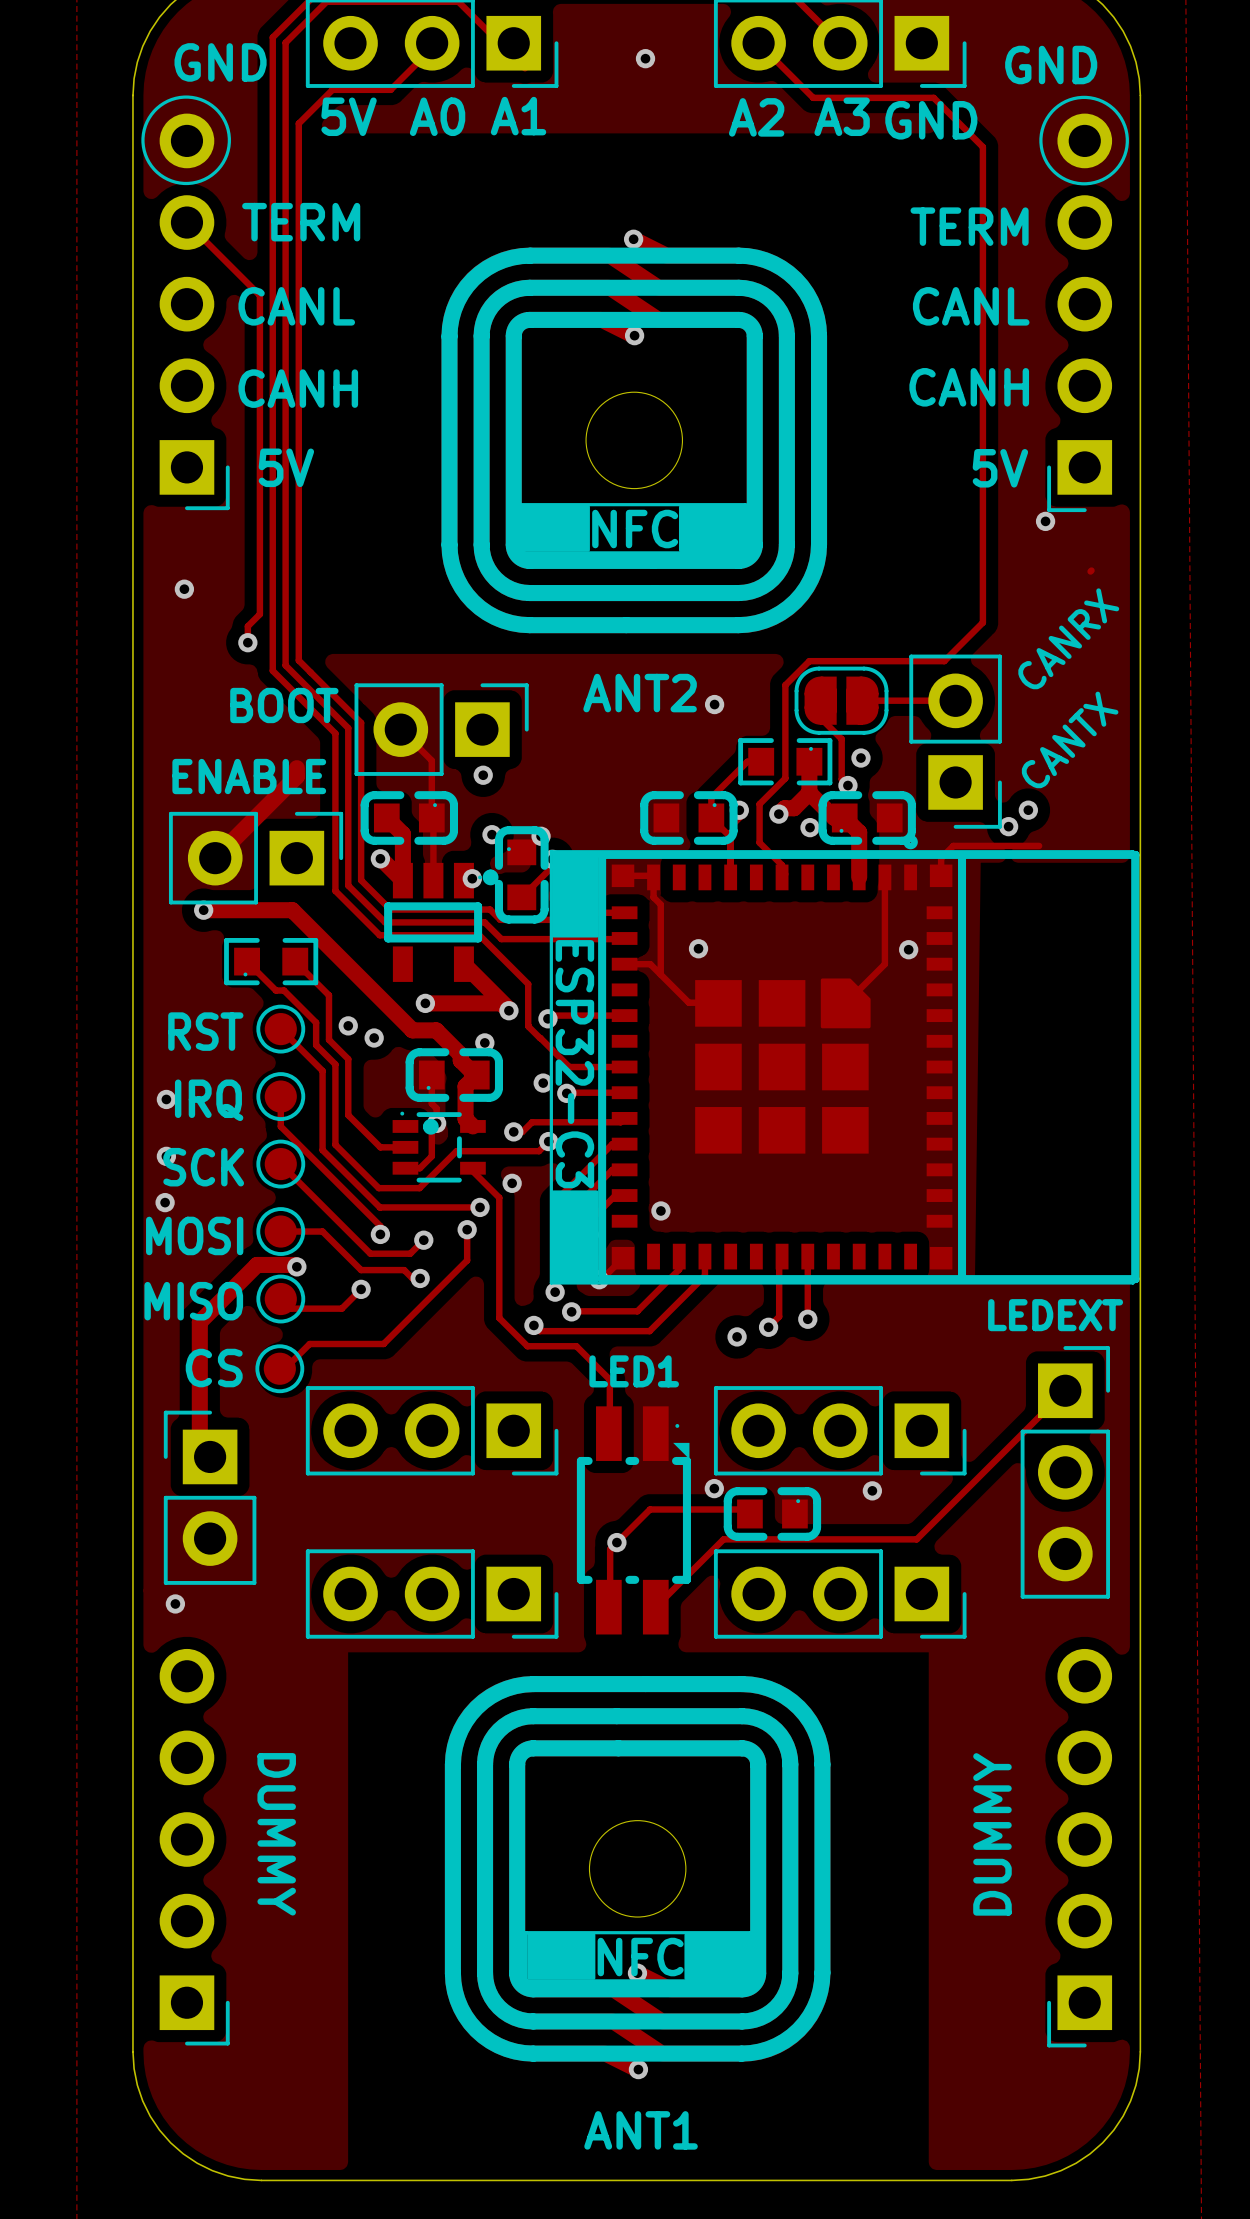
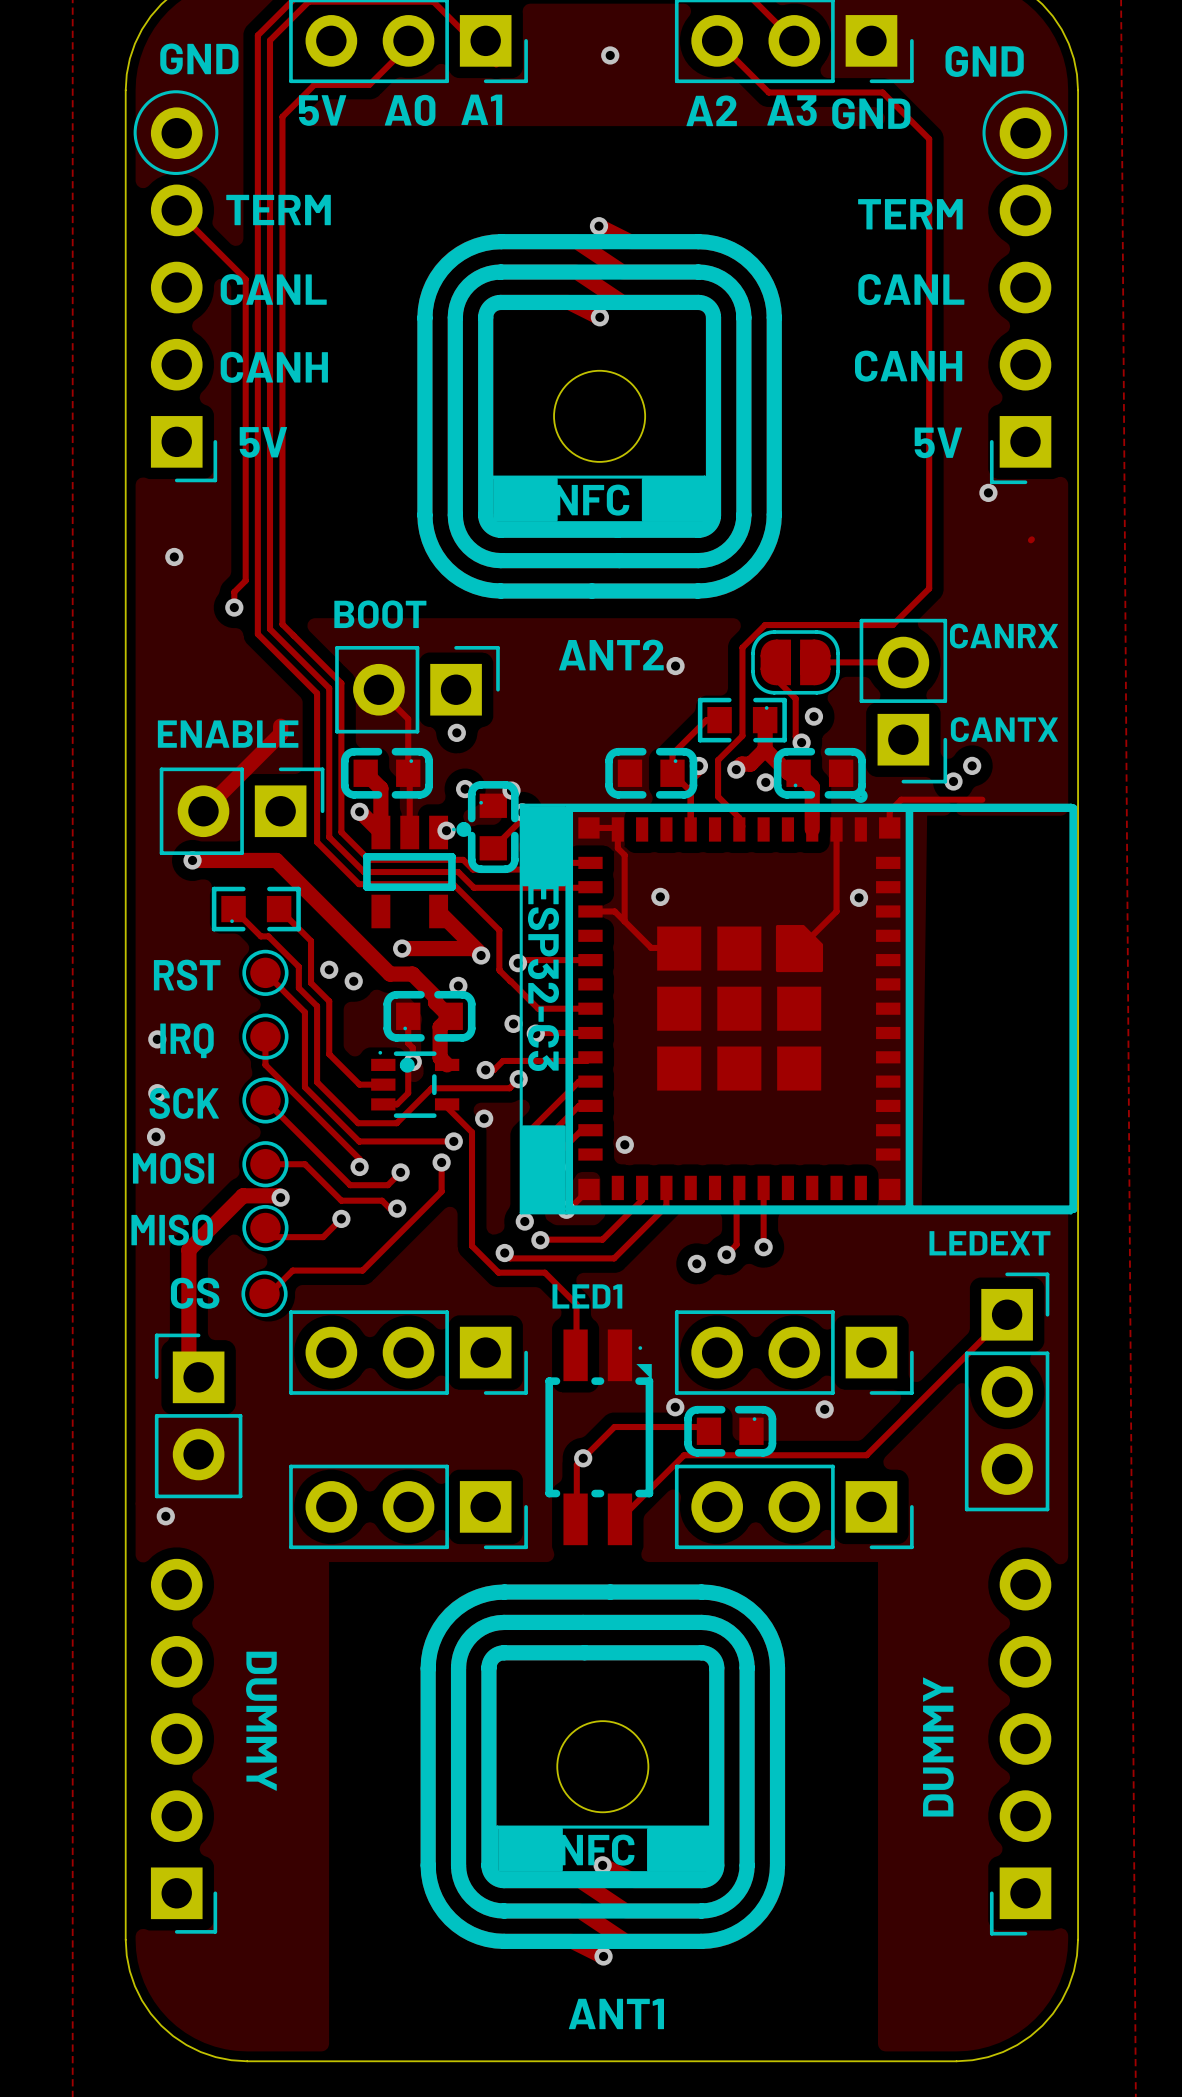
text rotation: 0° (1068, 638) -> 45° clockwise (1004, 636)
text position: BOOT (284, 705) -> BOOT (380, 614)
text rotation: 0° (1070, 739) -> 45° clockwise (1004, 729)

